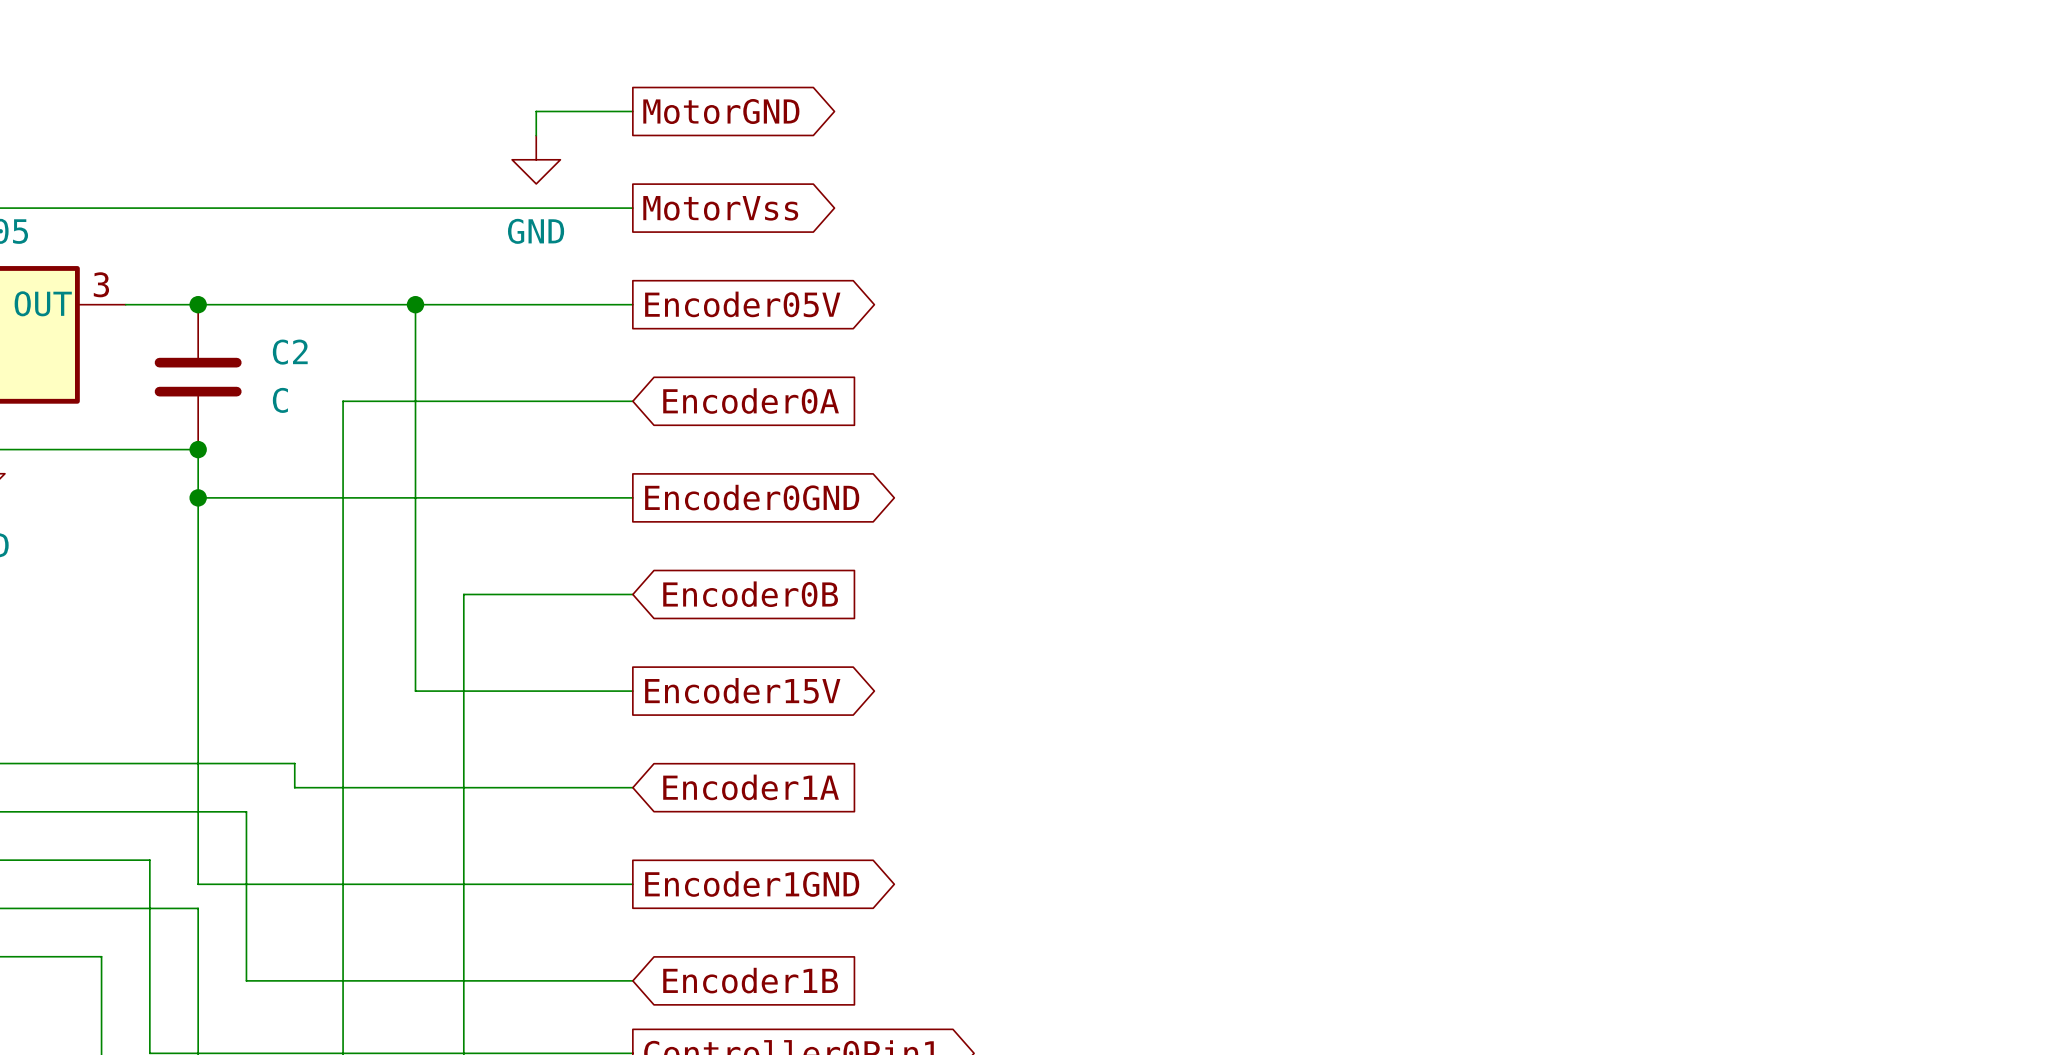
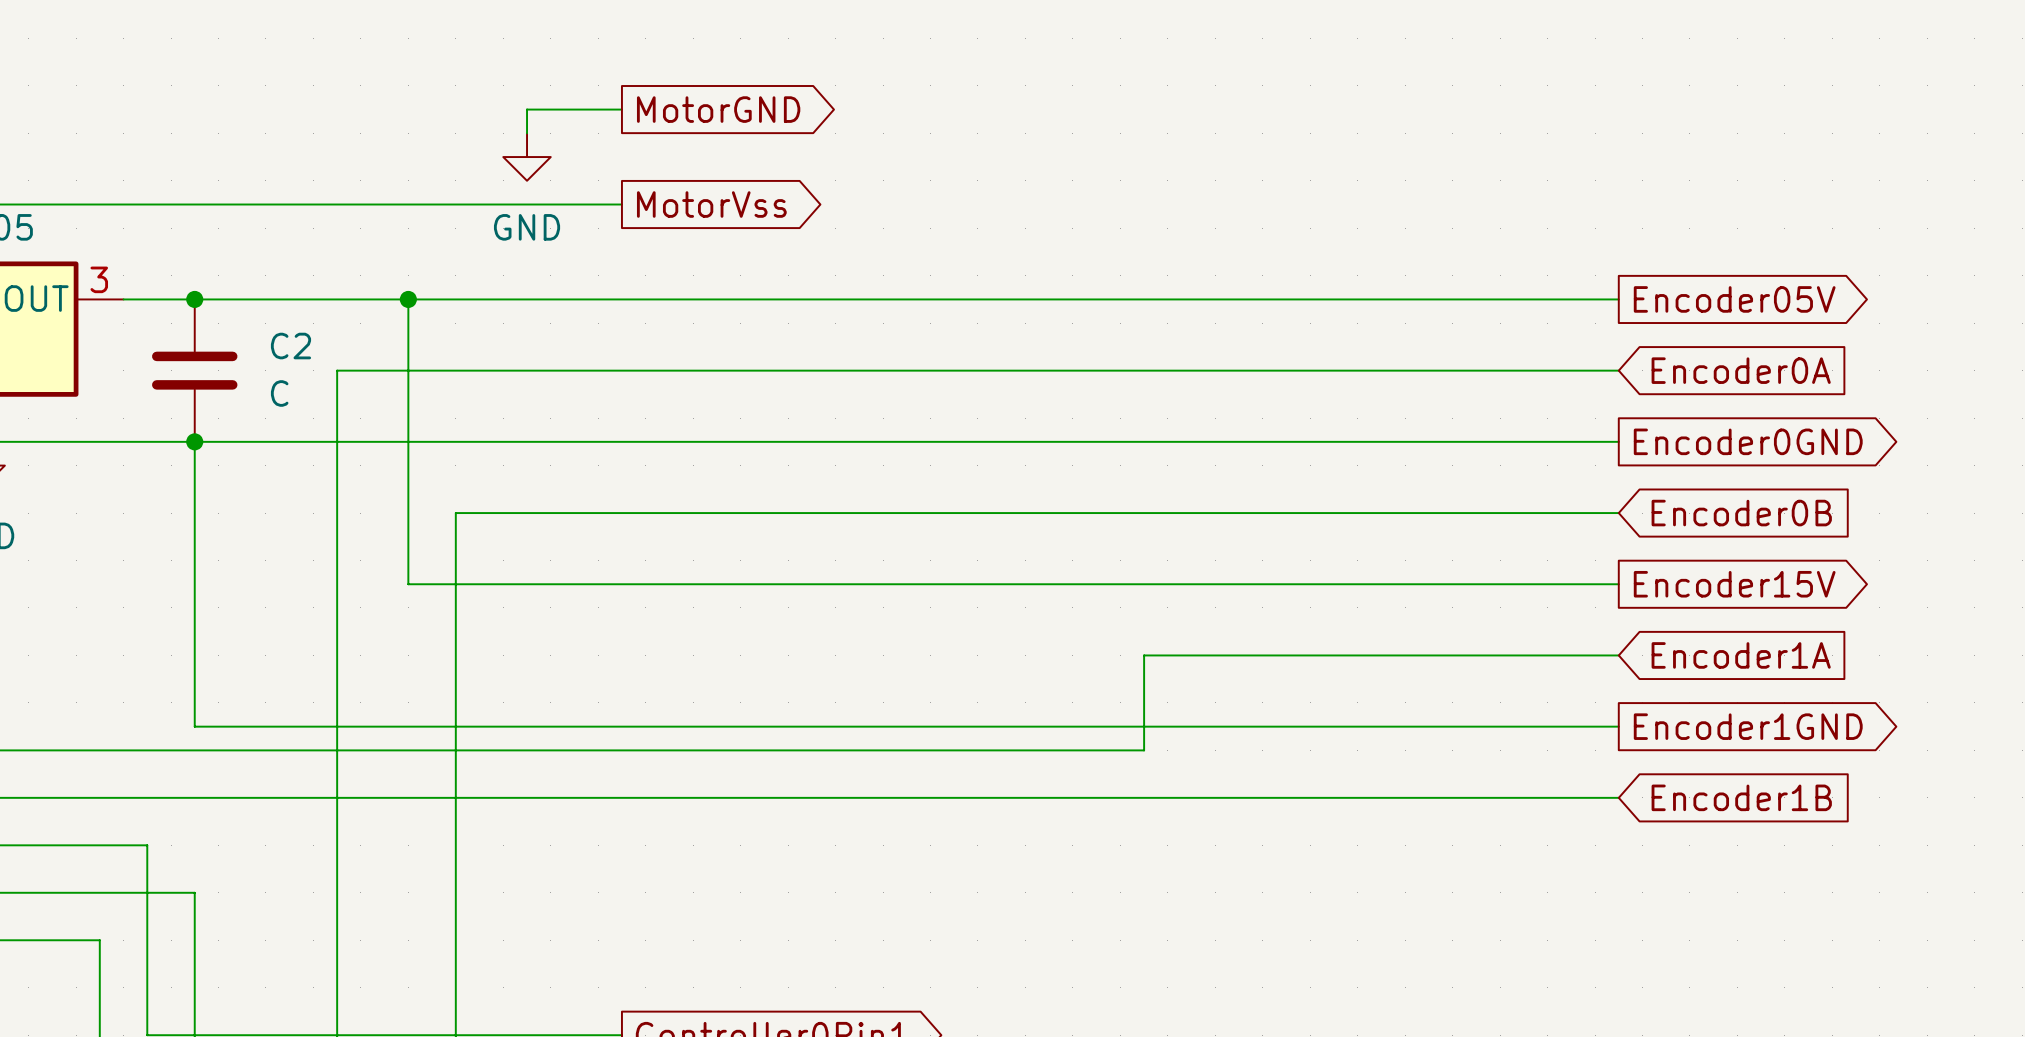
wire: none -> (621, 299) (1618, 299)
global label: Encoder05V (742, 304) -> none
global label: none -> Encoder05V (1734, 299)
global label: none -> Encoder0A (1741, 370)
wire: (343, 401) (632, 401) -> (337, 394) (337, 370) (1618, 370)
global label: Encoder0A (751, 401) -> none
wire: none -> (194, 441) (1618, 441)
global label: none -> Encoder0GND (1748, 441)
wire: (198, 497) (632, 497) -> none
junction: (198, 497) -> none
global label: Encoder0GND (752, 497) -> none
global label: none -> Encoder0B (1741, 513)
wire: (415, 594) (415, 691) (632, 691) -> (408, 584) (455, 584) (455, 513) (1618, 513)
wire: none -> (621, 584) (1618, 584)
global label: Encoder0B (750, 594) -> none
global label: none -> Encoder15V (1734, 584)
global label: none -> Encoder1A (1741, 655)
global label: Encoder15V (742, 690) -> none
wire: (198, 739) (198, 884) (632, 884) -> (194, 726) (1618, 726)
global label: none -> Encoder1GND (1748, 726)
wire: (294, 763) (294, 787) (632, 787) -> (289, 750) (1144, 750) (1144, 655) (1618, 655)
global label: Encoder1A (751, 787) -> none
wire: (246, 811) (246, 980) (632, 980) -> (242, 797) (1618, 797)
global label: none -> Encoder1B (1741, 797)
global label: Encoder1GND (752, 884) -> none
global label: Encoder1B (750, 980) -> none

